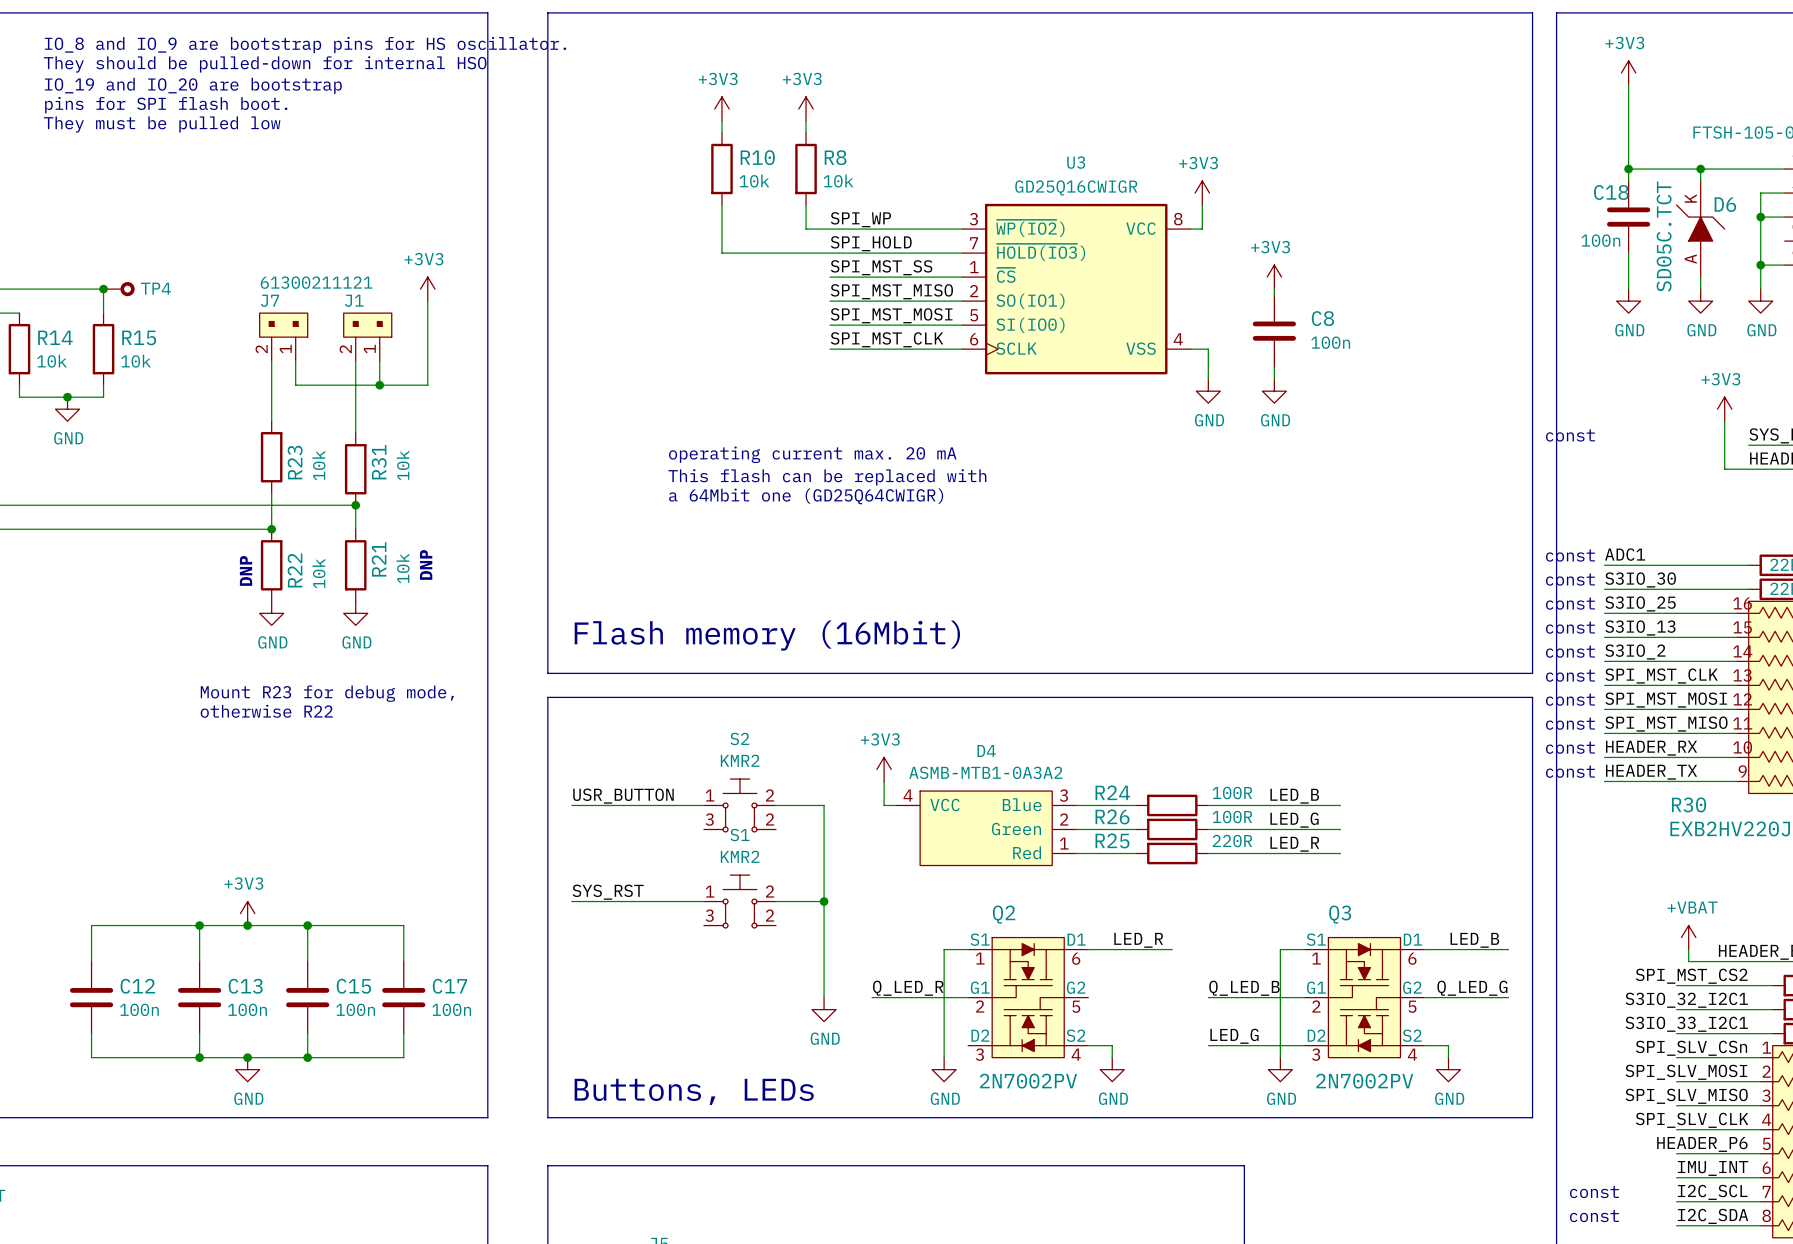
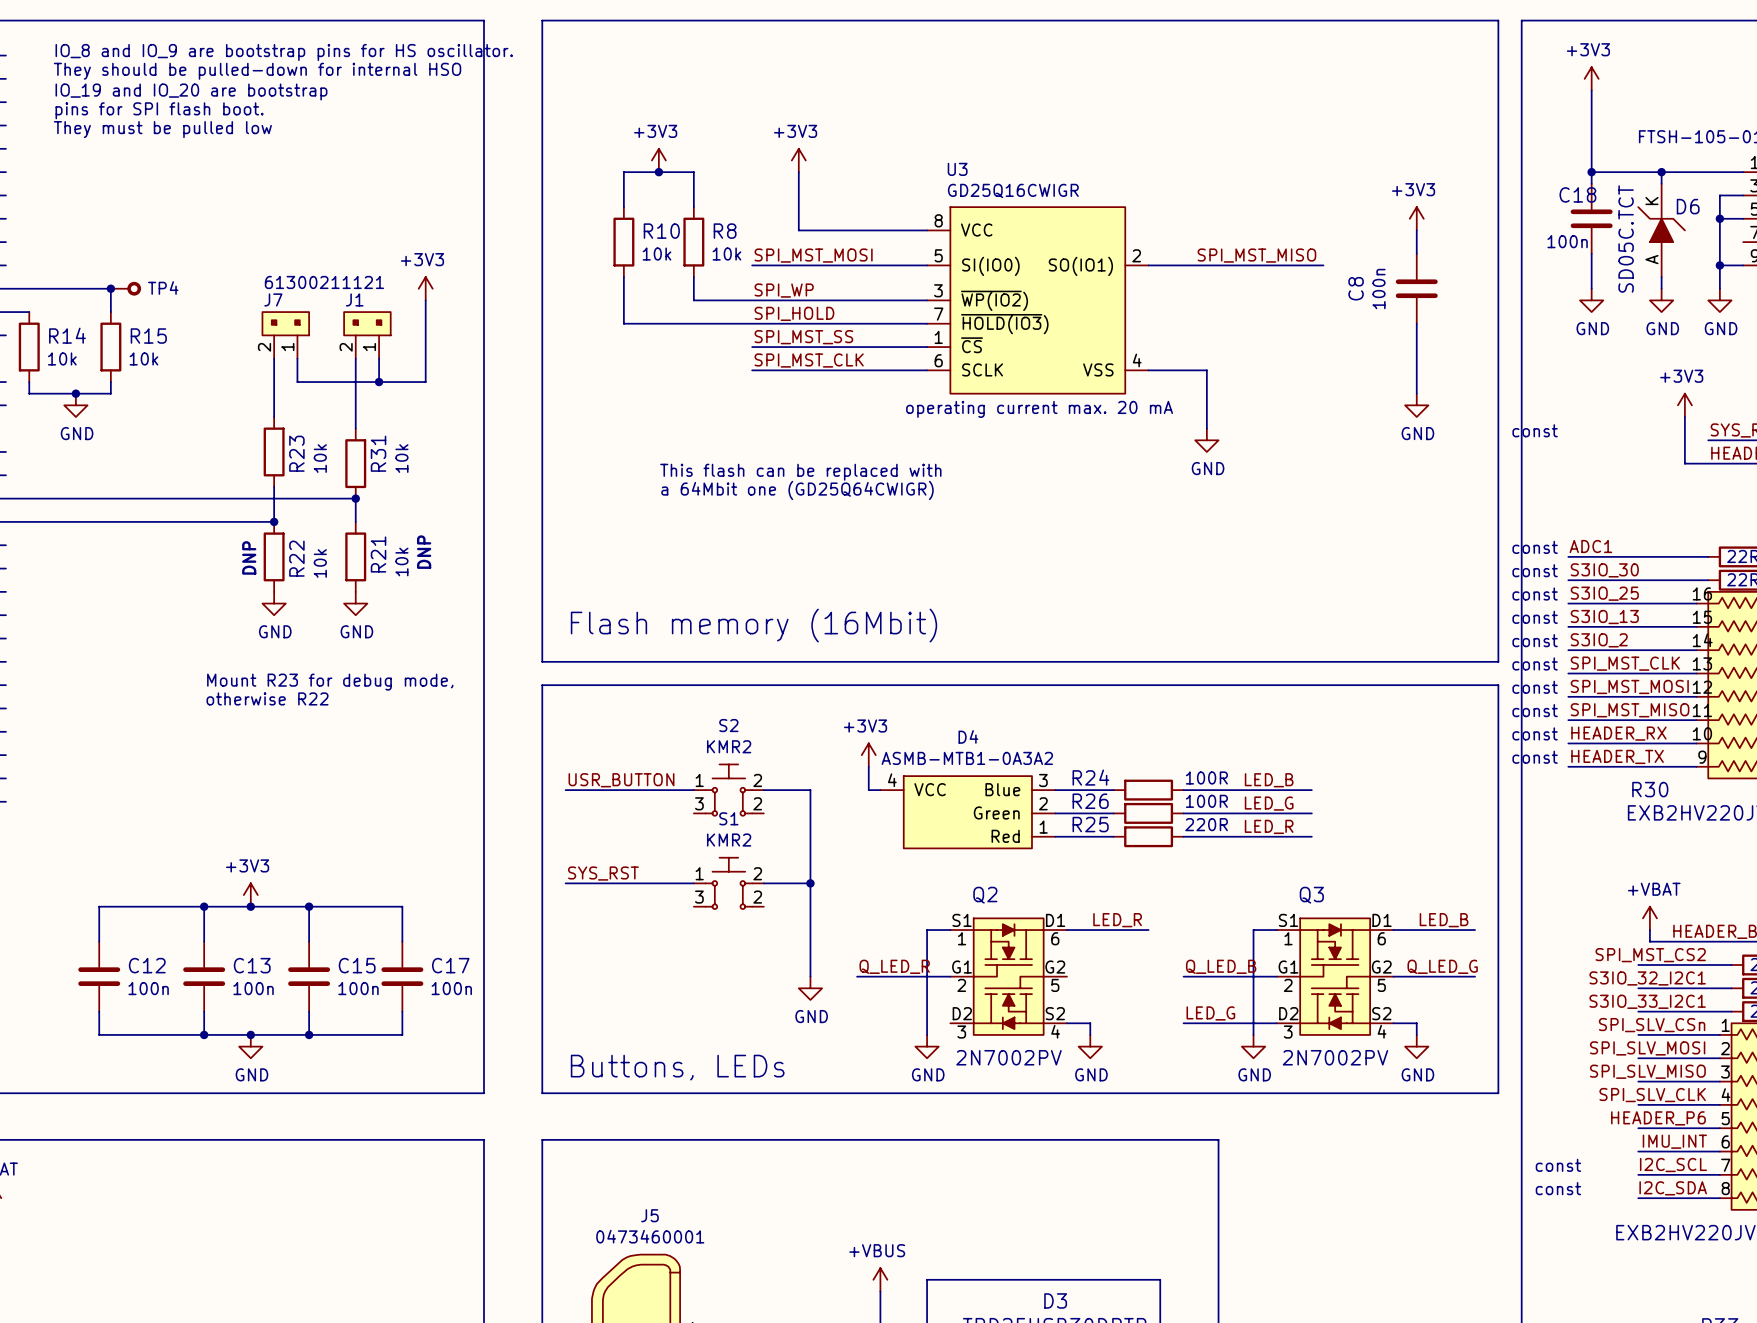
power symbol: +3V3 (721, 108) -> none
power symbol position: +3V3 (806, 108) -> +3V3 (798, 160)
wire: (721, 120) (721, 133) -> none
power symbol: none -> +3V3 (658, 160)
U3 name position: U3 (1076, 162) -> U3 (957, 169)
junction: none -> (658, 172)
R10 position: (721, 169) -> (623, 242)
R8 position: (806, 169) -> (693, 242)
U3 value position: GD25Q16CWIGR (1076, 187) -> GD25Q16CWIGR (1013, 190)
power symbol: +3V3 (1202, 193) -> none
U3 symbol: [962, 203, 1191, 375] -> [927, 207, 1149, 394]
wire: none -> (623, 207) (623, 172) (693, 172) (693, 207)
wire: (721, 205) (721, 253) (962, 253) -> none
wire: (806, 205) (806, 229) (812, 229) -> (798, 172) (798, 230)
wire: (1202, 205) (1202, 229) (1190, 229) -> none
power symbol: none -> +3V3 (1416, 218)
label position: SPI_WP (860, 219) -> SPI_WP (784, 290)
wire: none -> (1416, 230) (1416, 253)
label position: SPI_HOLD (871, 243) -> SPI_HOLD (794, 313)
label: none -> SPI_MST_MISO (1256, 255)
wire: none -> (752, 265) (927, 265)
wire: none -> (1148, 265) (1323, 265)
label position: SPI_MST_SS (881, 267) -> SPI_MST_SS (803, 337)
wire: none -> (623, 277) (623, 323) (816, 323)
wire: none -> (693, 277) (693, 300) (816, 300)
wire: (830, 277) (962, 277) -> none
power symbol: +3V3 (1274, 277) -> none
wire: (1274, 289) (1274, 295) -> none
label: SPI_MST_MISO (891, 291) -> none
label position: SPI_MST_MOSI (891, 315) -> SPI_MST_MOSI (813, 255)
C8 name rotation: 0° (1322, 318) -> 90° counterclockwise (1356, 288)
C8 name position: C8 (1322, 318) -> C8 (1356, 288)
wire: none -> (1416, 323) (1416, 393)
C8 position: (1274, 331) -> (1416, 288)
label position: SPI_MST_CLK (887, 339) -> SPI_MST_CLK (809, 360)
C8 text rotation: 0° (1330, 342) -> 90° counterclockwise (1379, 289)
C8 text position: 100n (1330, 342) -> 100n (1379, 289)
wire: none -> (752, 347) (816, 347)
wire: (1190, 349) (1208, 349) (1208, 379) -> none
wire: (1274, 367) (1274, 379) -> none
wire: none -> (752, 370) (927, 370)
wire: none -> (1148, 370) (1206, 370) (1206, 428)
power symbol: GND (1208, 391) -> none
power symbol: GND (1274, 391) -> none
power symbol: none -> GND (1416, 405)
text: none -> operating current max. 20 mA (1039, 409)
power symbol: none -> GND (1206, 440)
text: operating current max. 20 mA (812, 454) -> none

